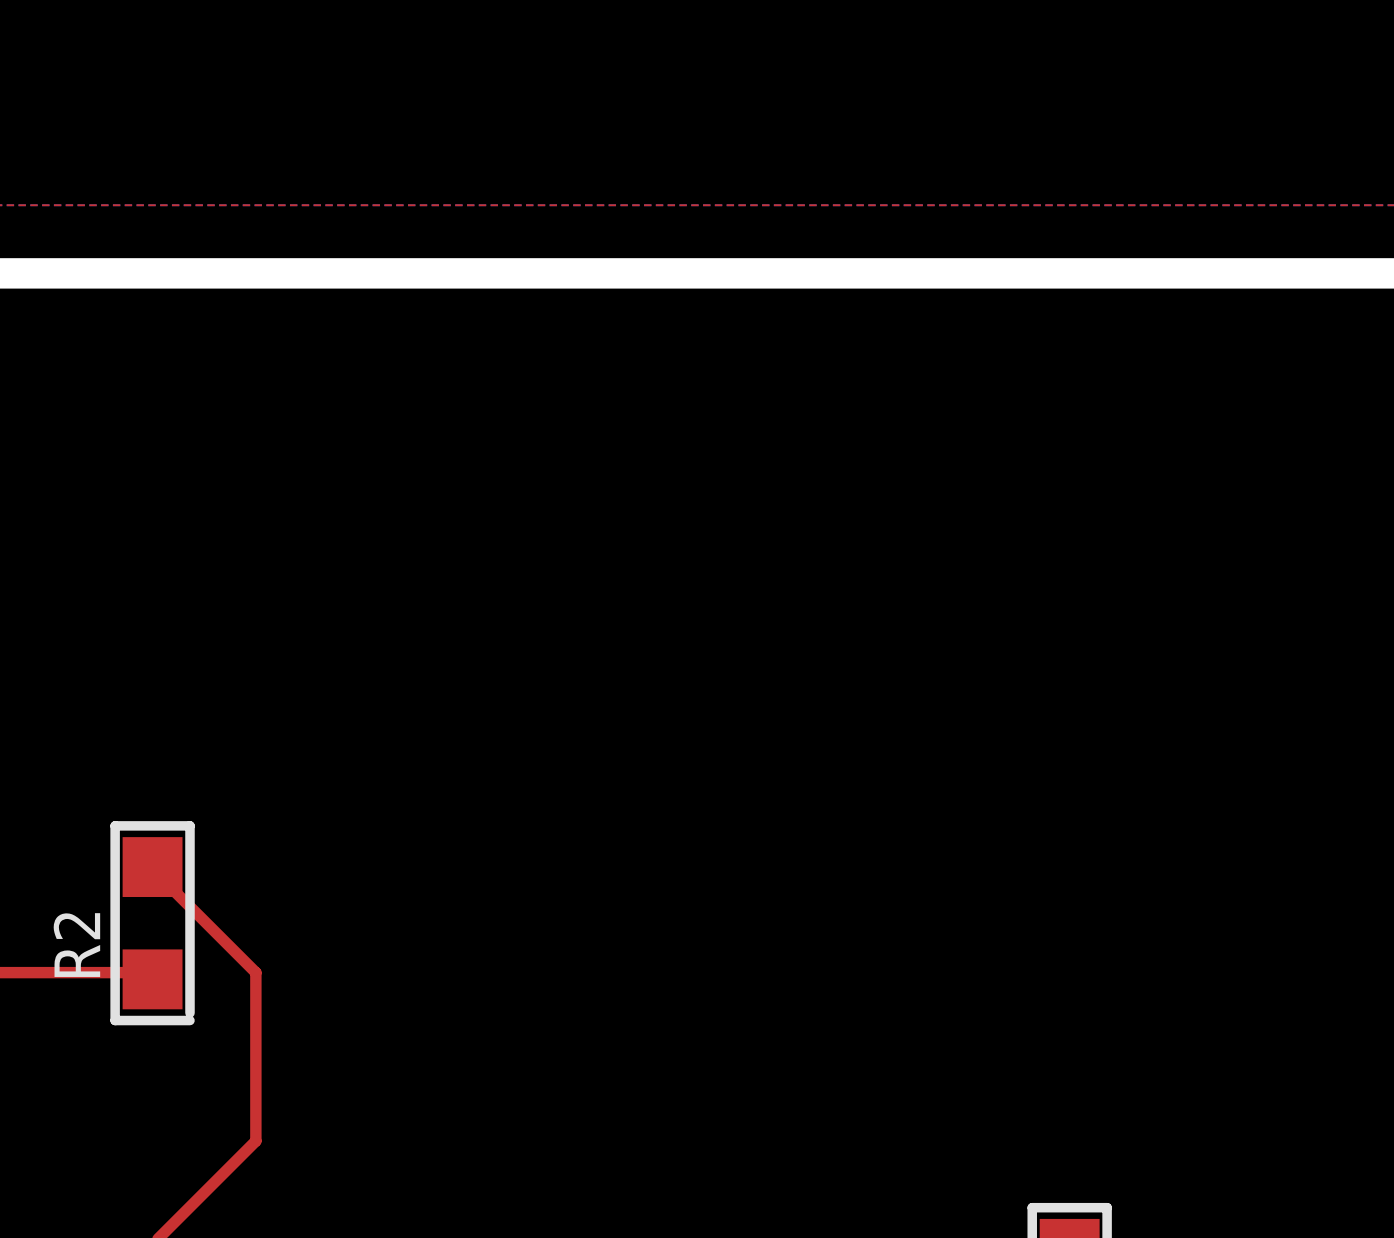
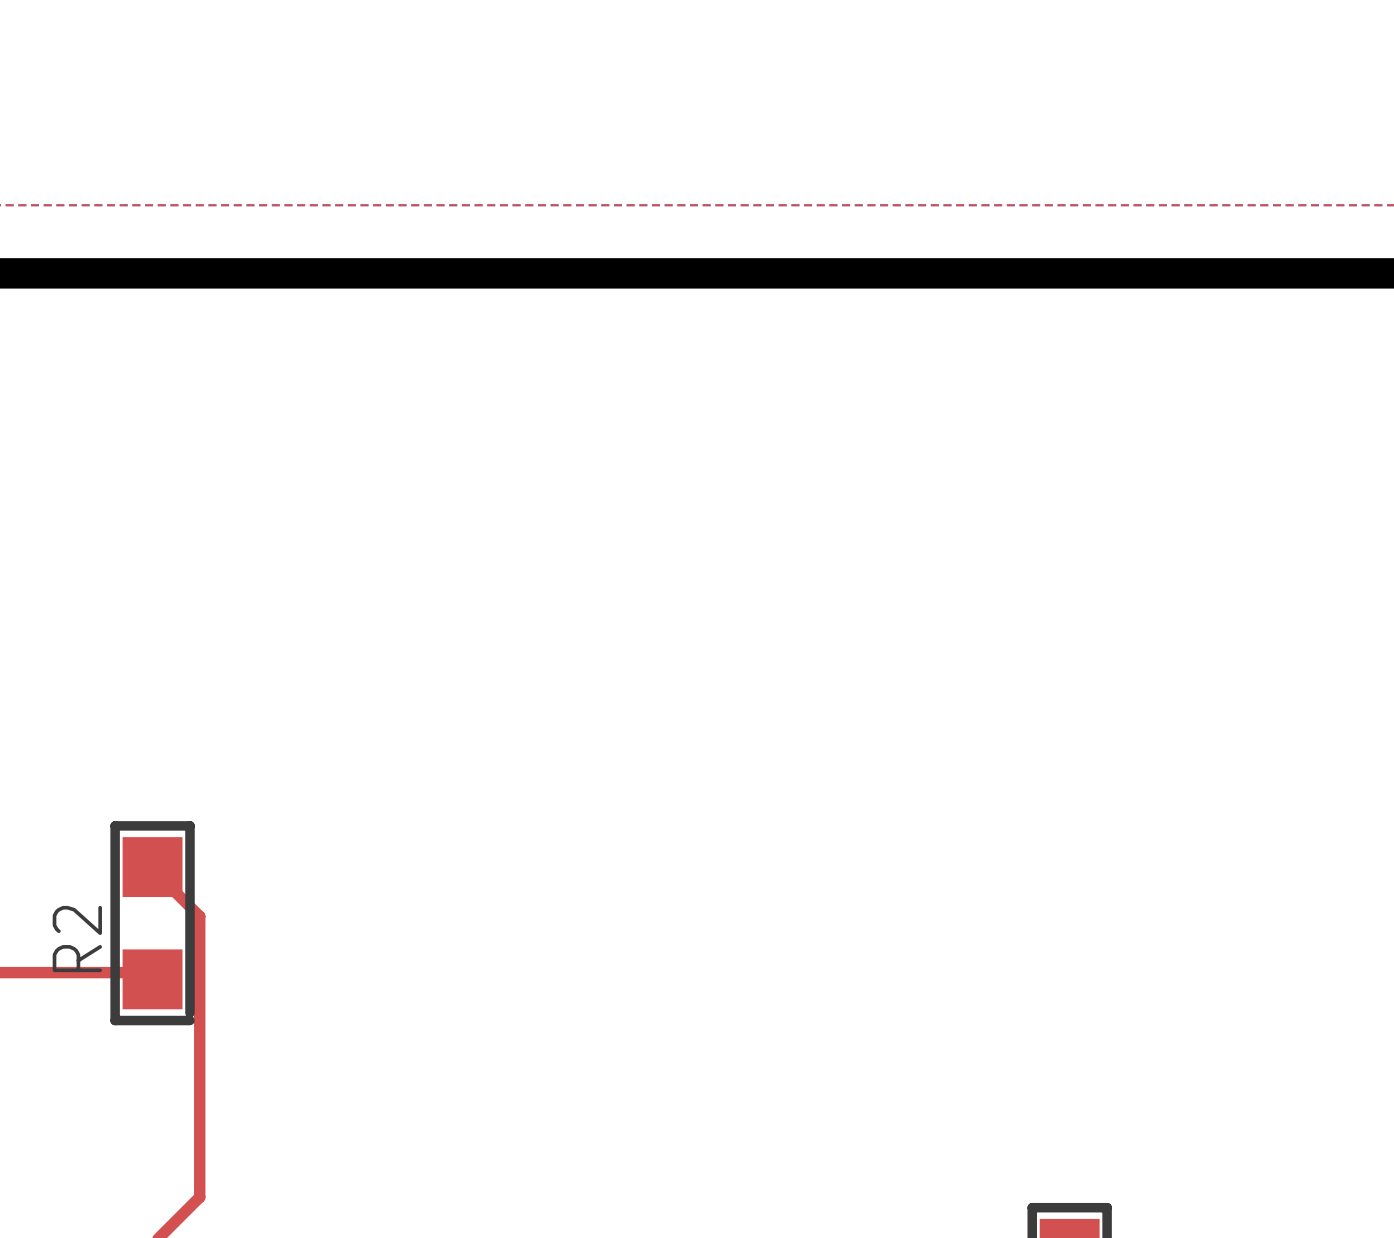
top track: (199, 916) (255, 972) (255, 1141) (199, 1197) -> (199, 916) (199, 1197)

